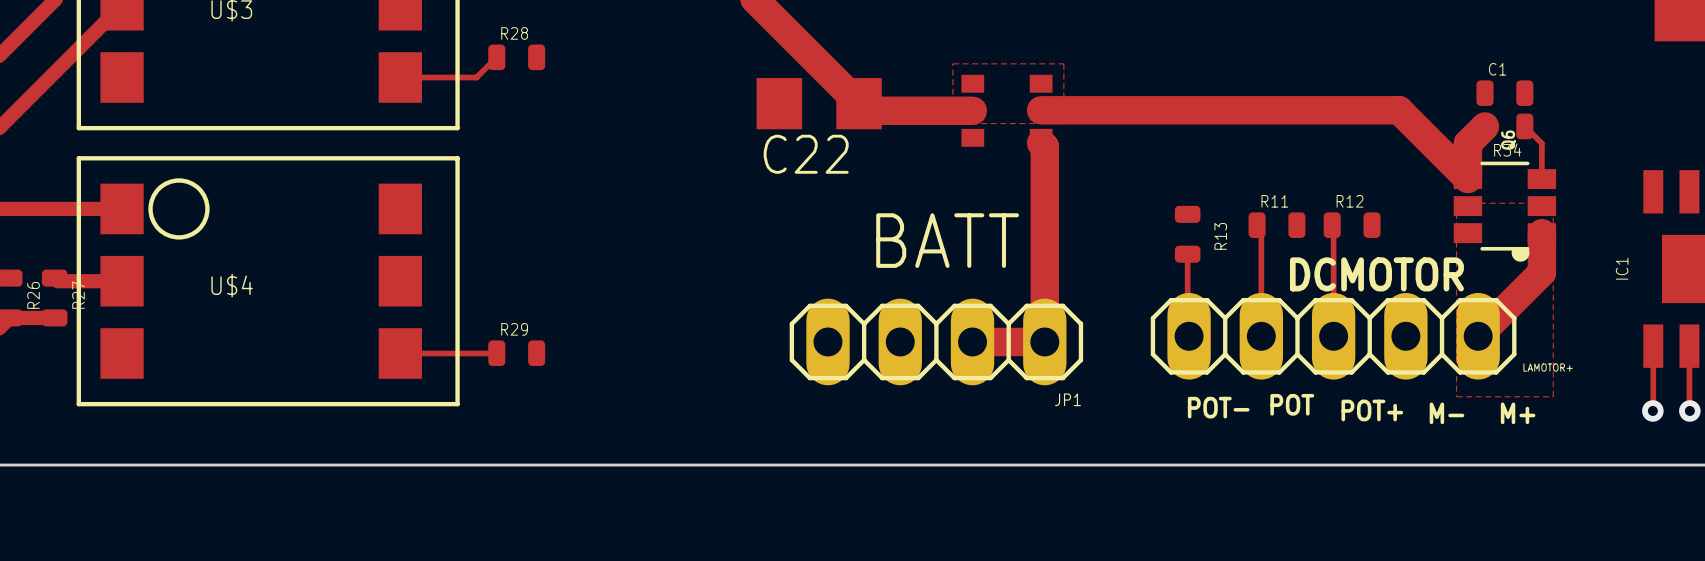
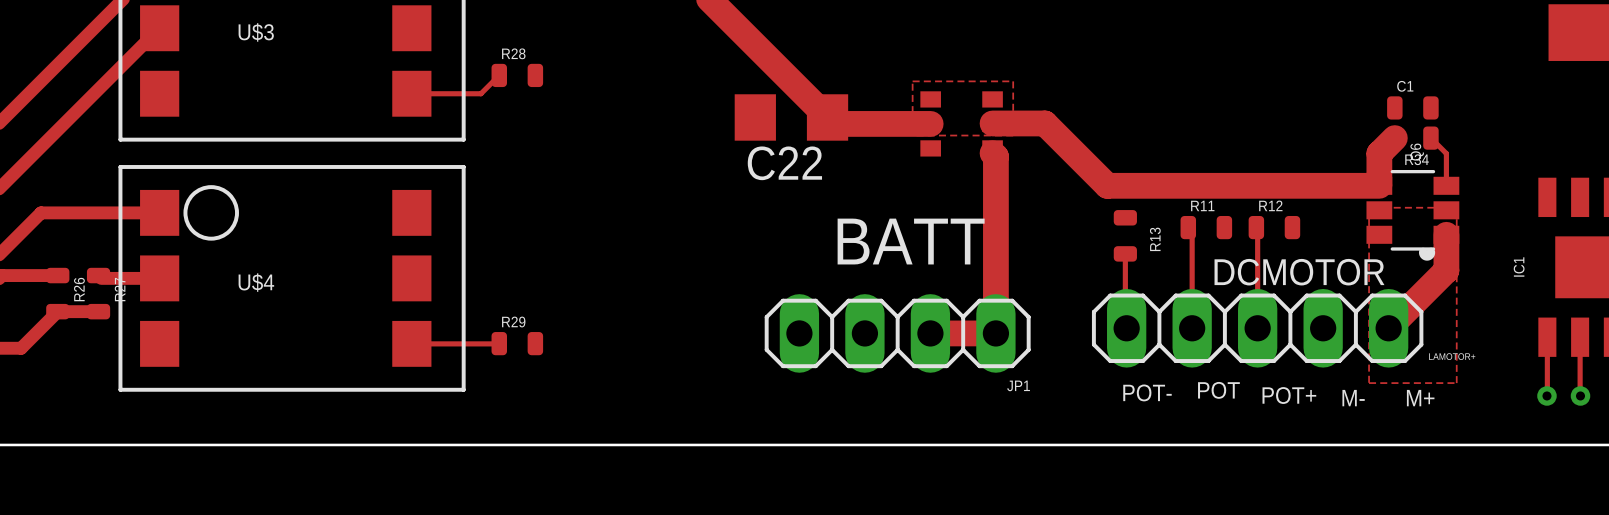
track: (1098, 110) (1399, 110) (1467, 179) -> (1044, 123) (1107, 185) (1379, 185)

